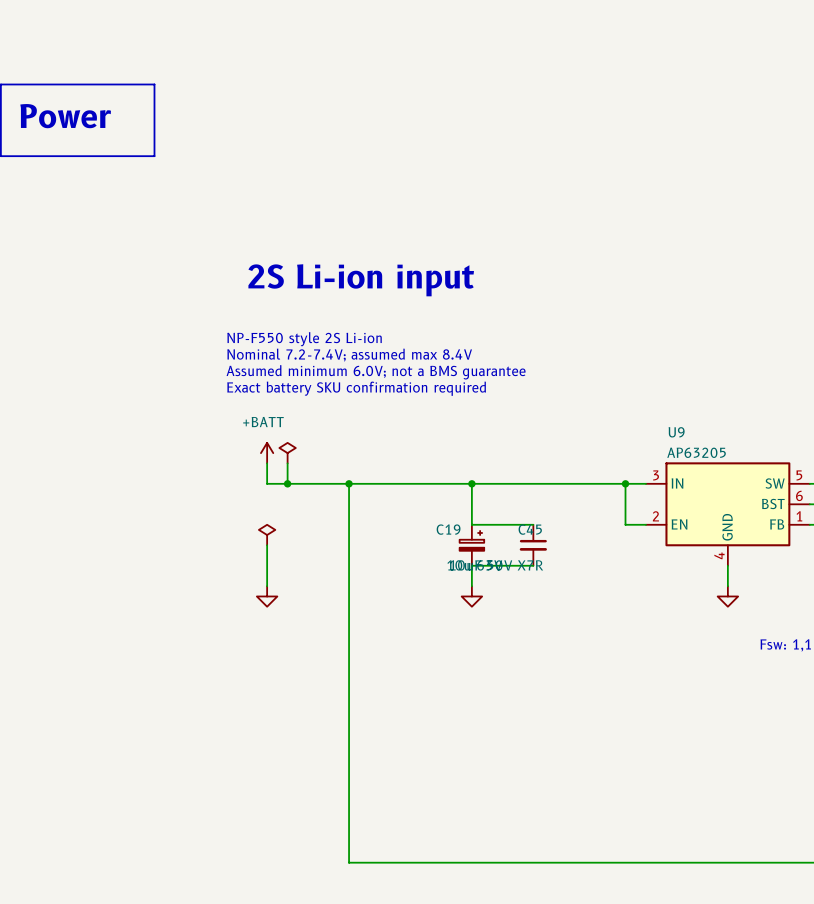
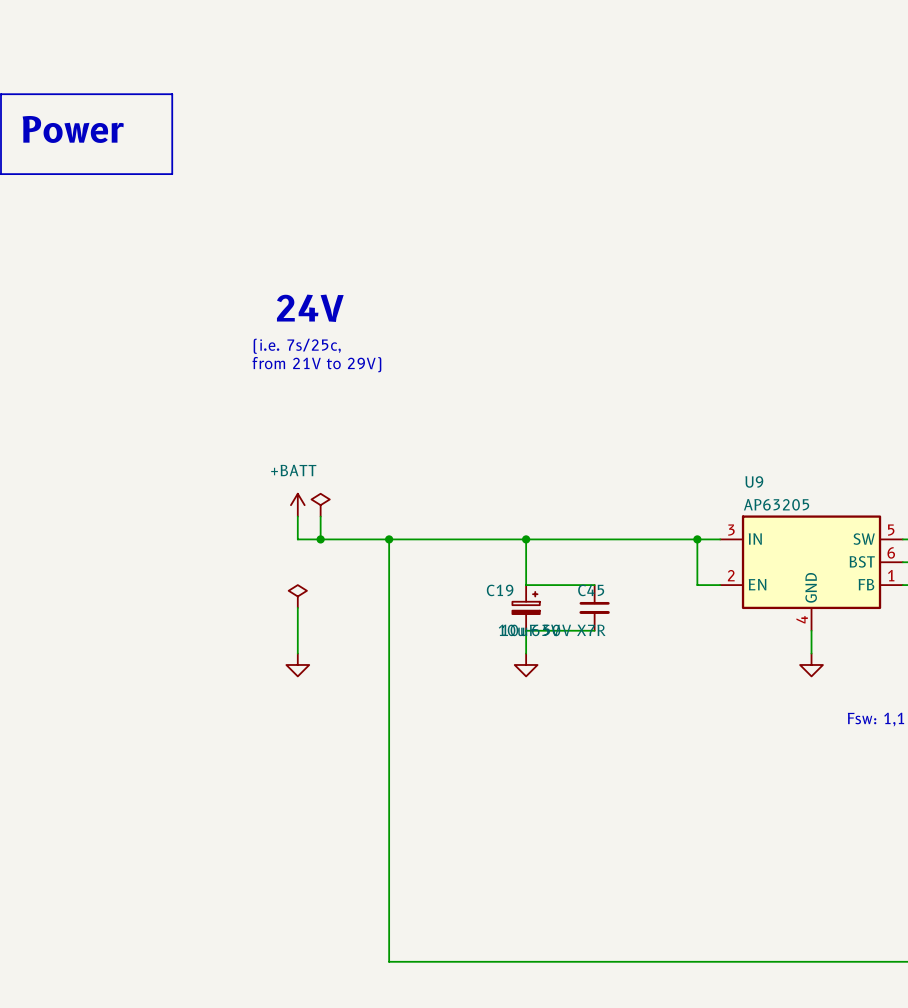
text: 2S Li-ion input (361, 280) -> 24V (310, 308)
text: none -> (i.e. 7s/25c, (297, 346)
text: none -> from 21V to 29V) (316, 364)
text: NP-F550 style 2S Li-ion (304, 339) -> none
text: Nominal 7.2-7.4V; assumed max 8.4V (349, 355) -> none
text: Assumed minimum 6.0V; not a BMS guarantee (376, 372) -> none
text: Exact battery SKU confirmation required (356, 388) -> none

